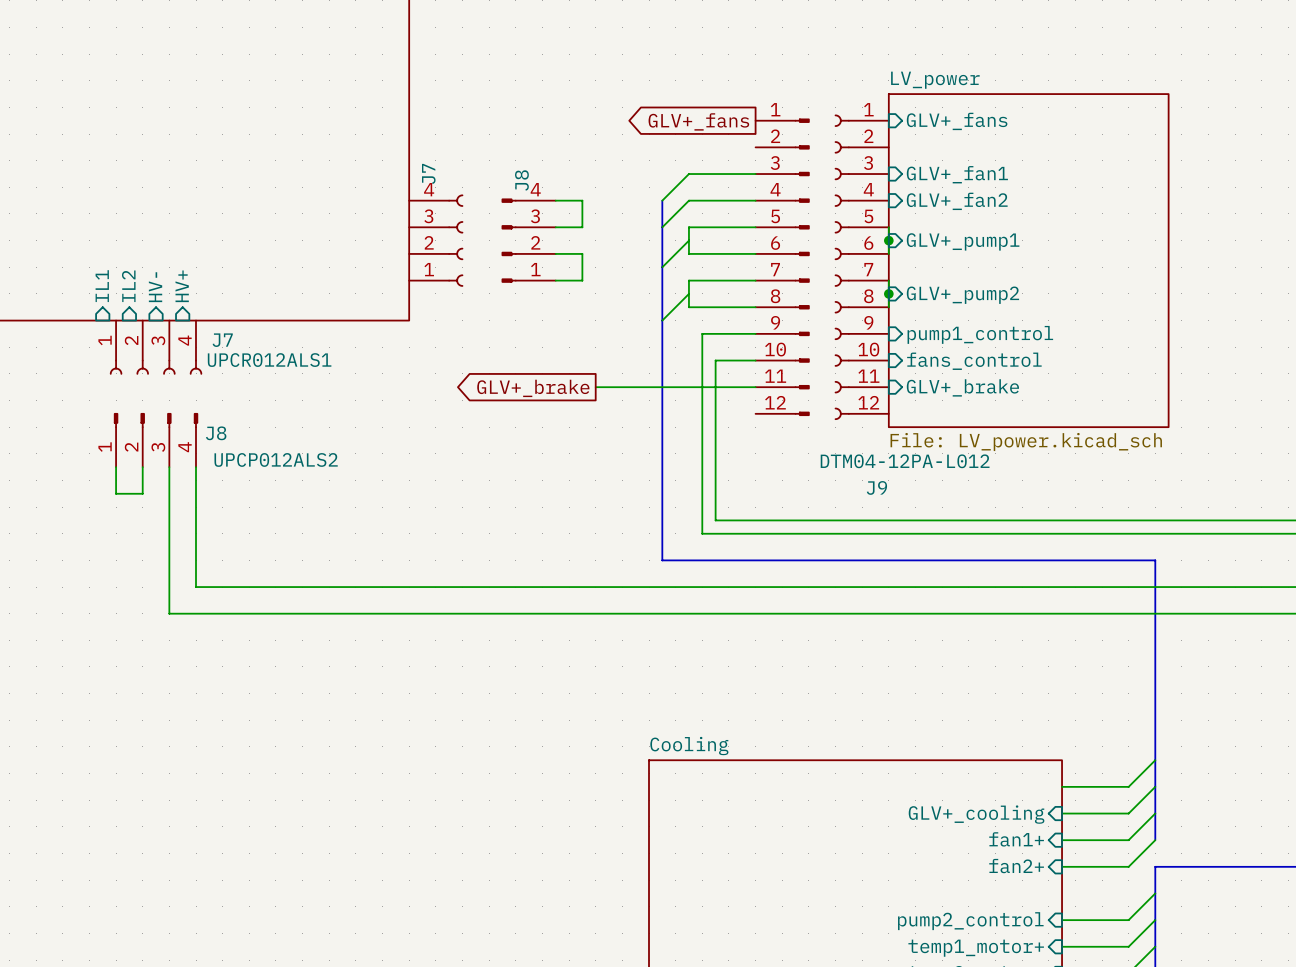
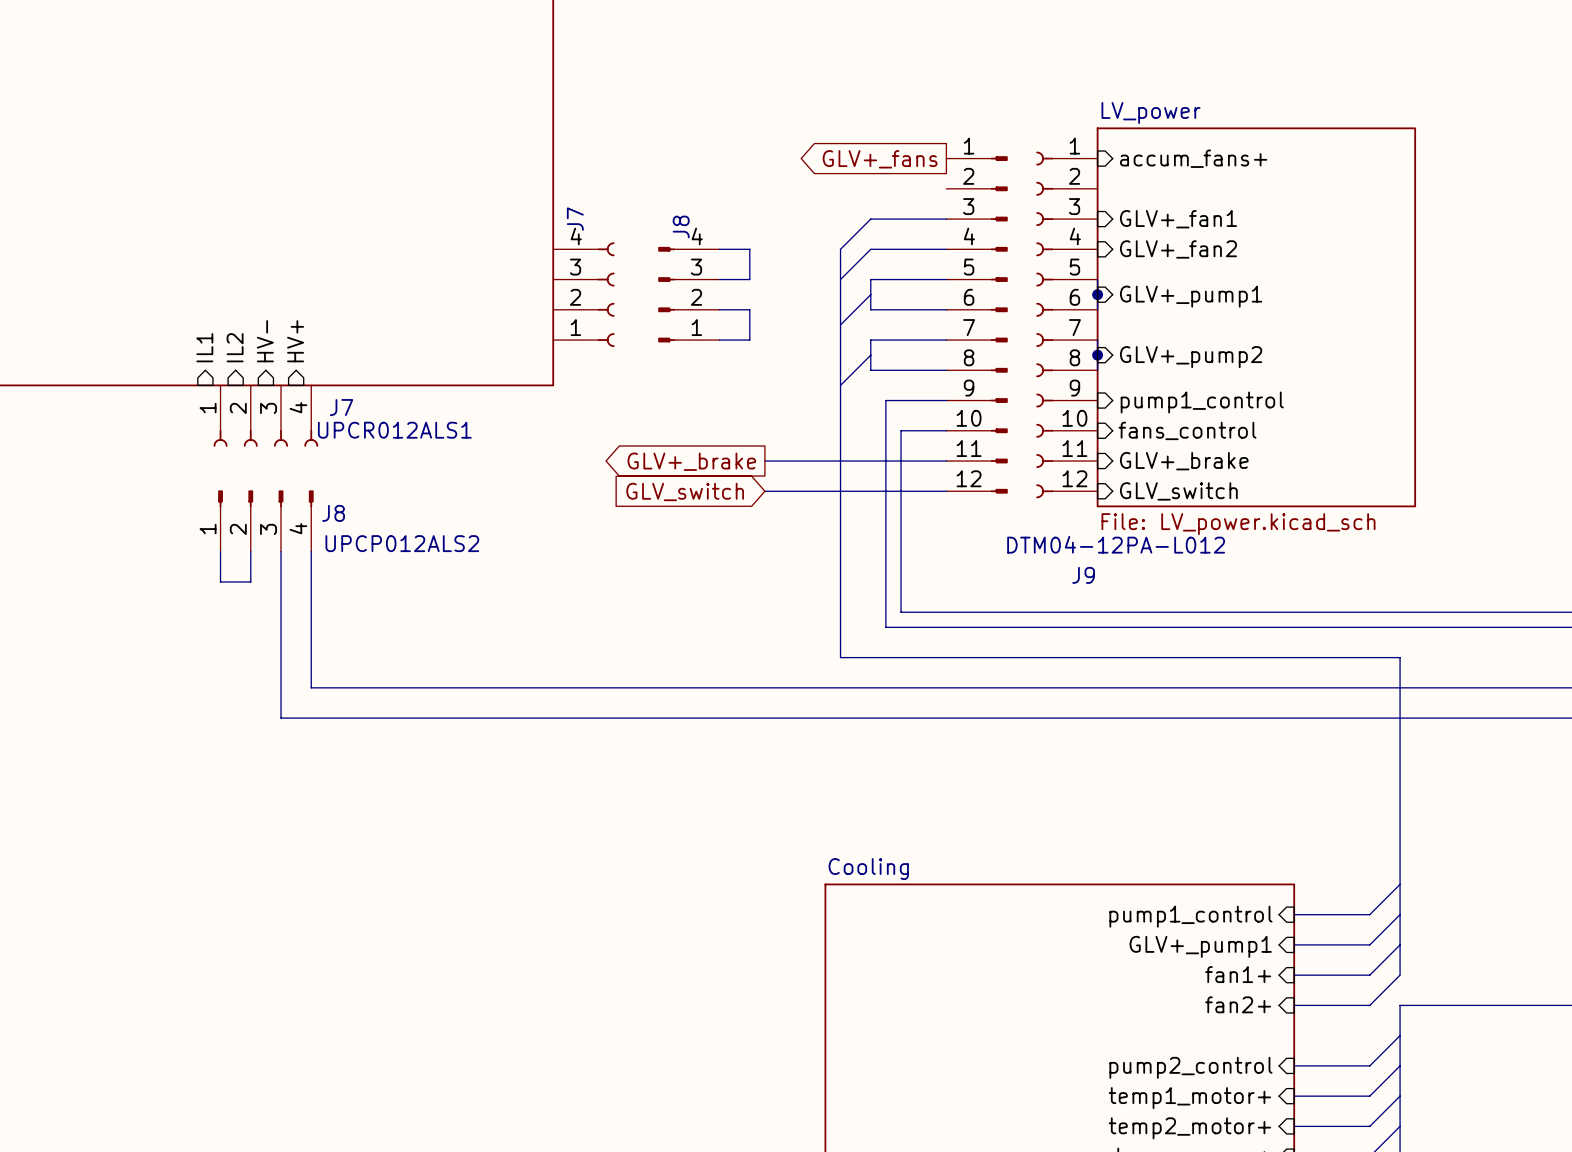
sheet pin: GLV+_fans (957, 121) -> accum_fans+ (1193, 158)
wire: none -> (764, 491) (946, 491)
global label: none -> GLV_switch (685, 491)
sheet pin: none -> GLV_switch (1178, 491)
sheet pin: none -> pump1_control (1190, 916)
sheet pin: GLV+_cooling (976, 814) -> GLV+_pump1 (1200, 946)

